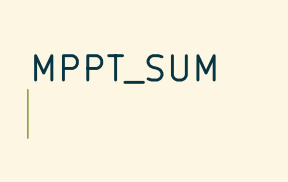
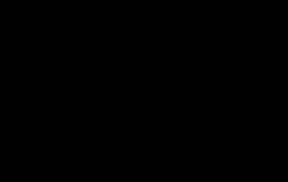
label: MPPT_SUM (124, 69) -> none
wire: (27, 89) (27, 138) -> none

